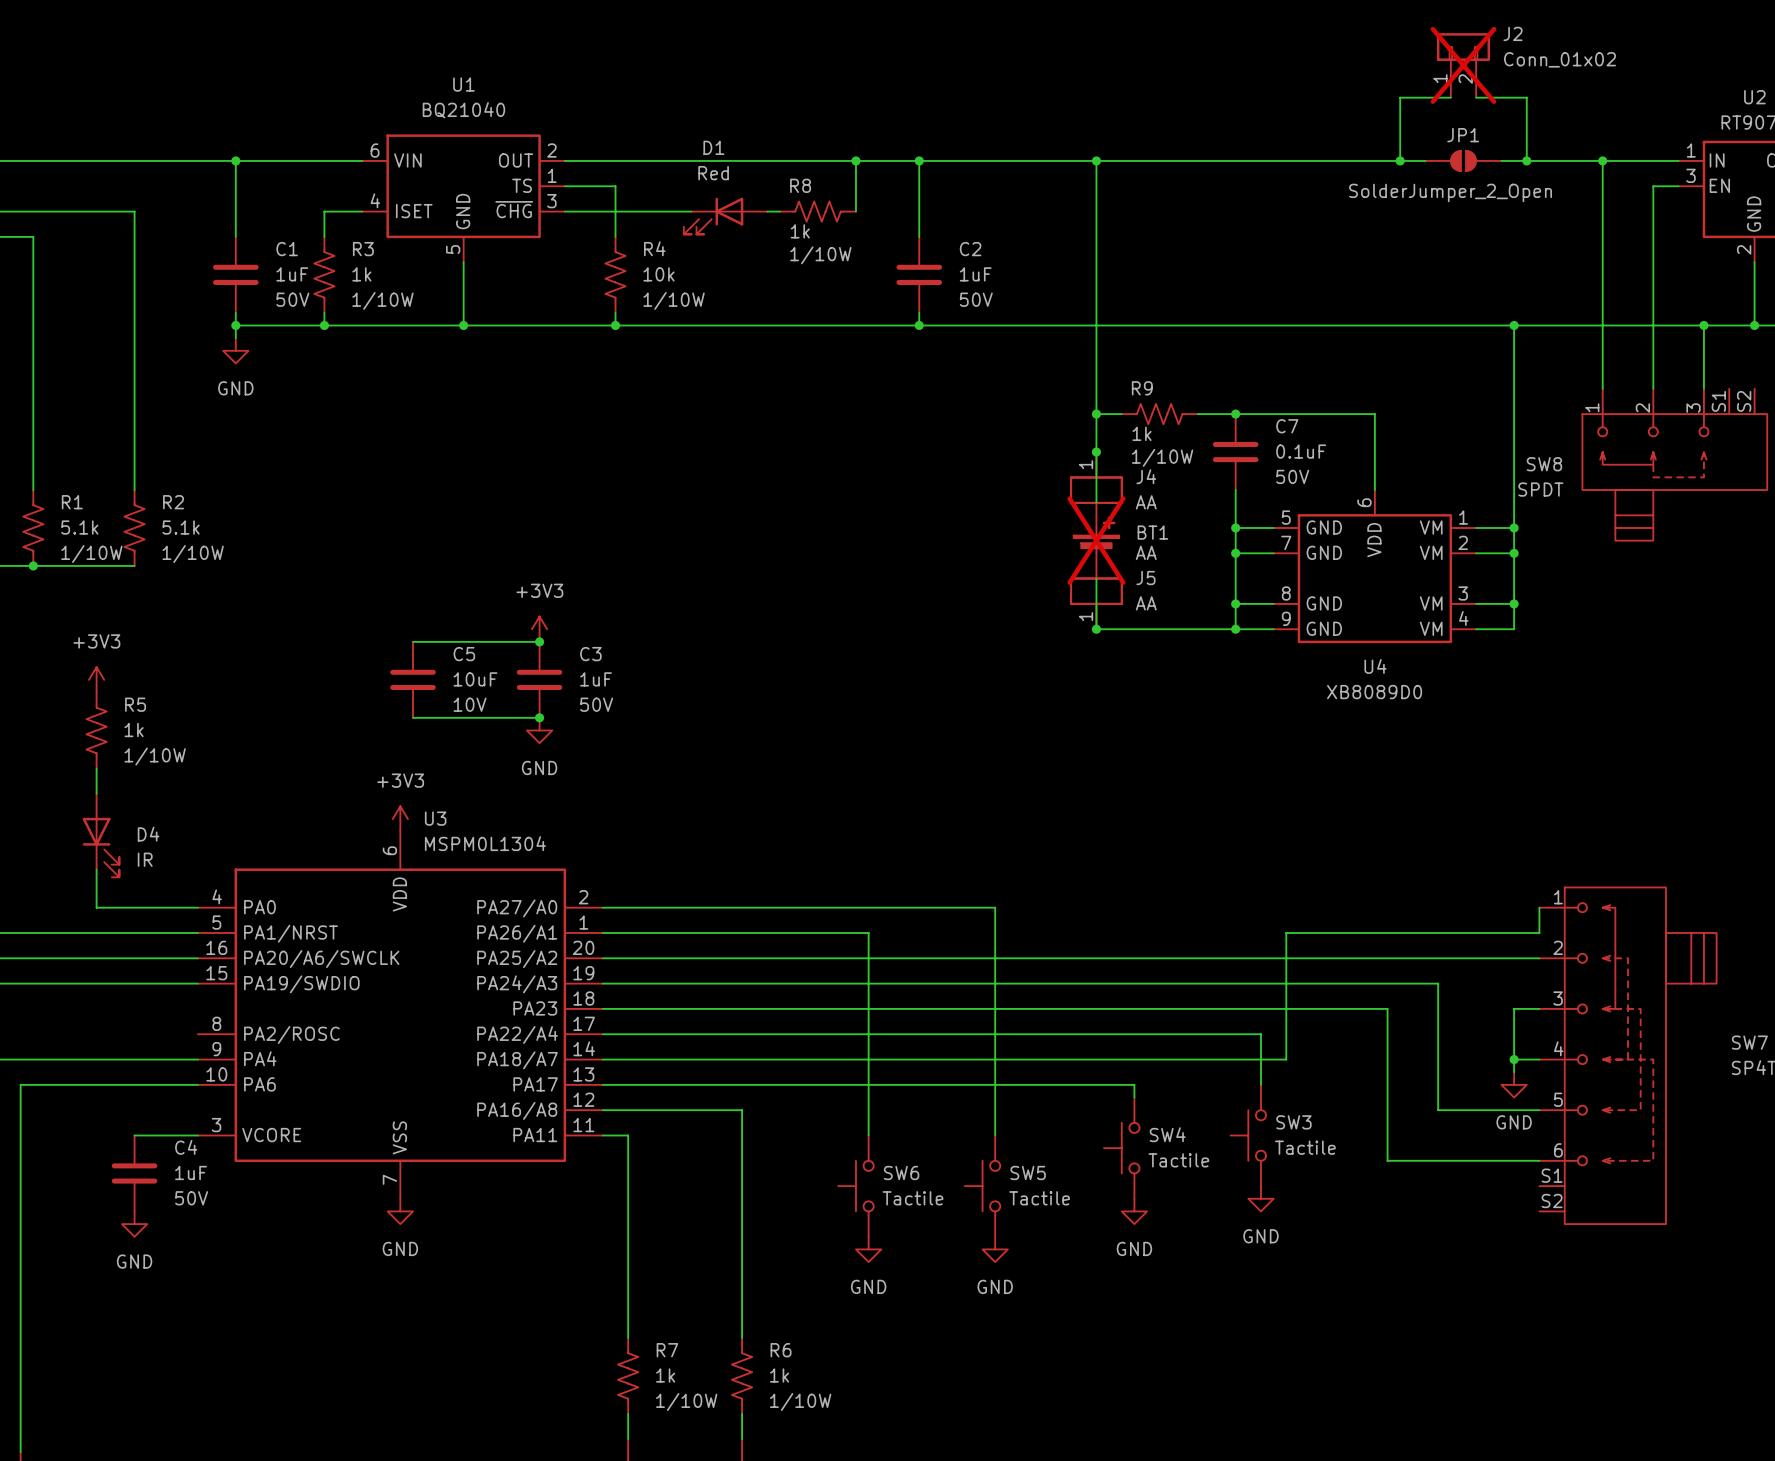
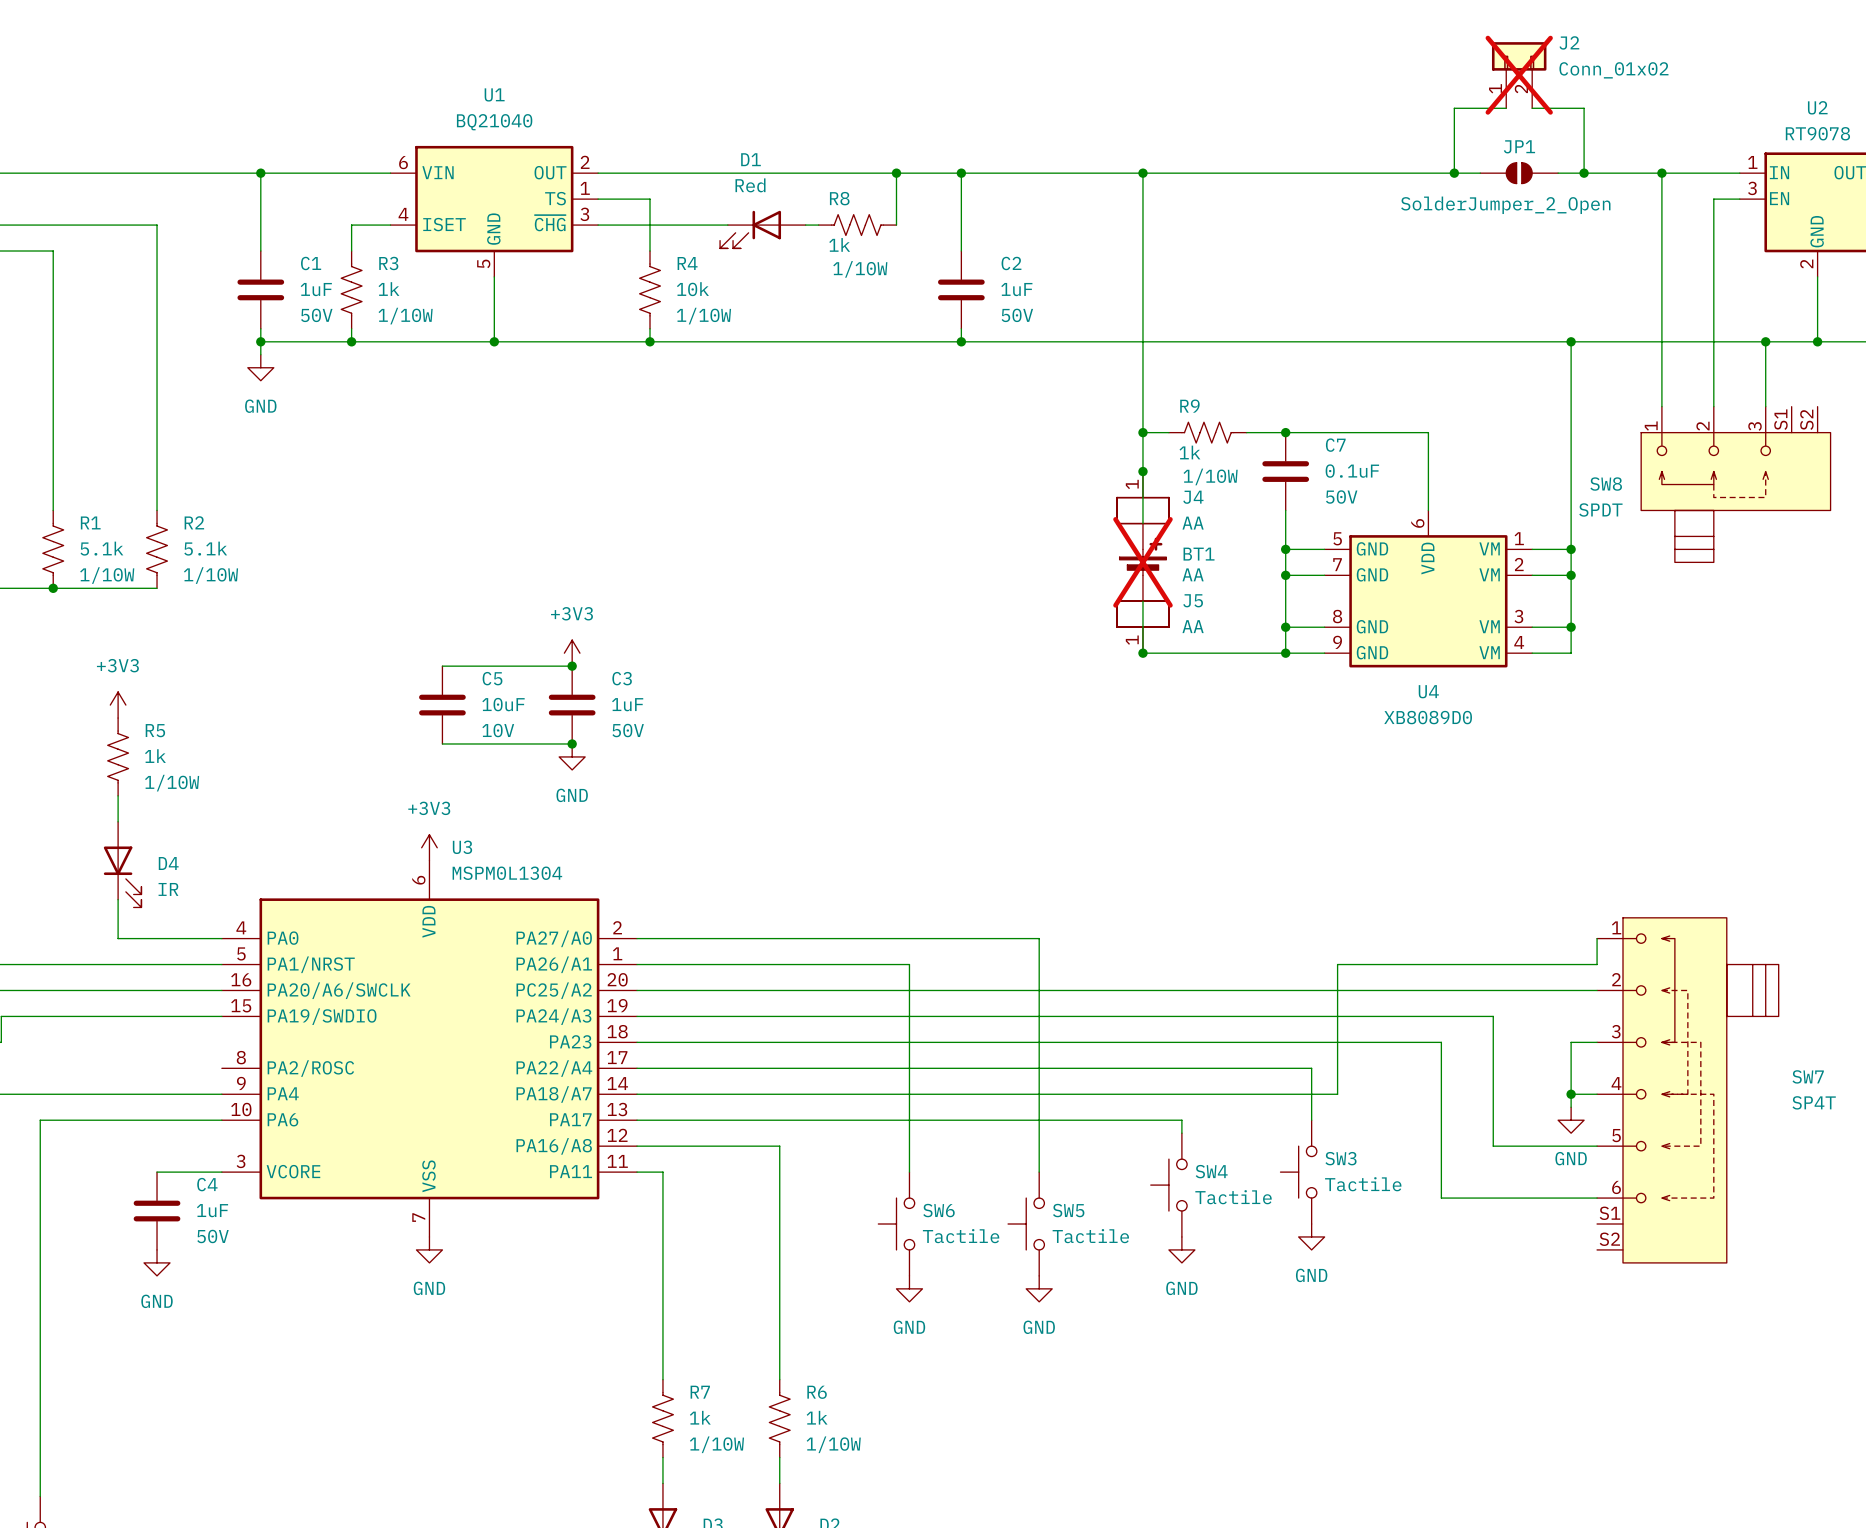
U3 pin name: PA25/A2 (517, 959) -> PC25/A2 (554, 990)

